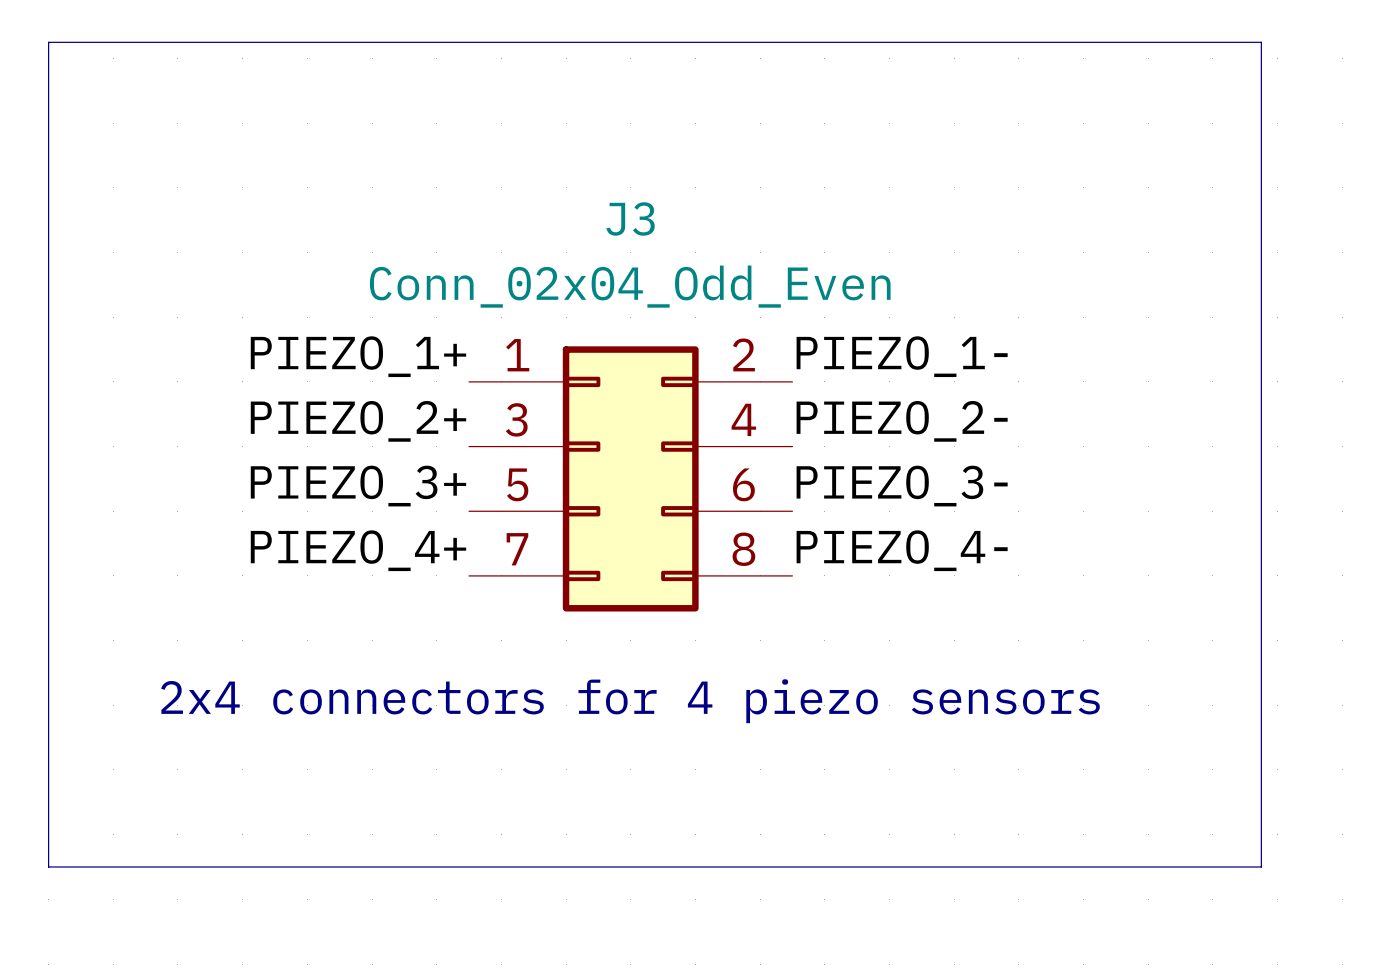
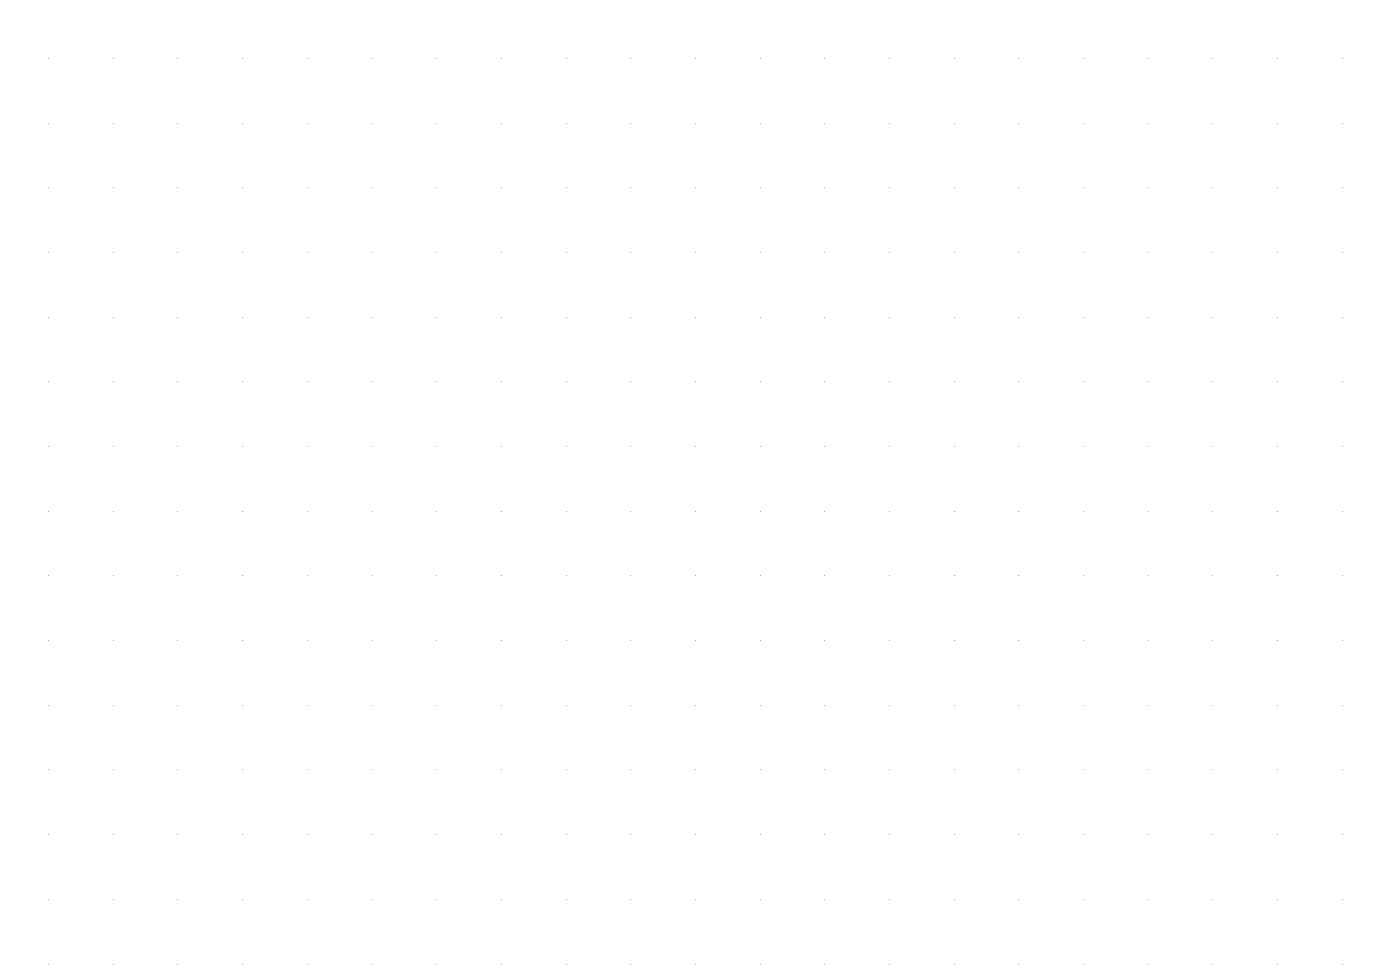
line: (48, 42) (1261, 42) (1261, 867) (48, 867) (48, 42) -> none
label: PIEZO_1+ (358, 356) -> none
label: PIEZO_1- (902, 356) -> none
label: PIEZO_2+ (358, 421) -> none
label: PIEZO_2- (902, 421) -> none
J3: Conn_02x04_Odd_Even (630, 478) -> none
label: PIEZO_3+ (358, 486) -> none
label: PIEZO_3- (902, 486) -> none
label: PIEZO_4+ (358, 550) -> none
label: PIEZO_4- (902, 550) -> none
text: 2x4 connectors for 4 piezo sensors (630, 701) -> none

